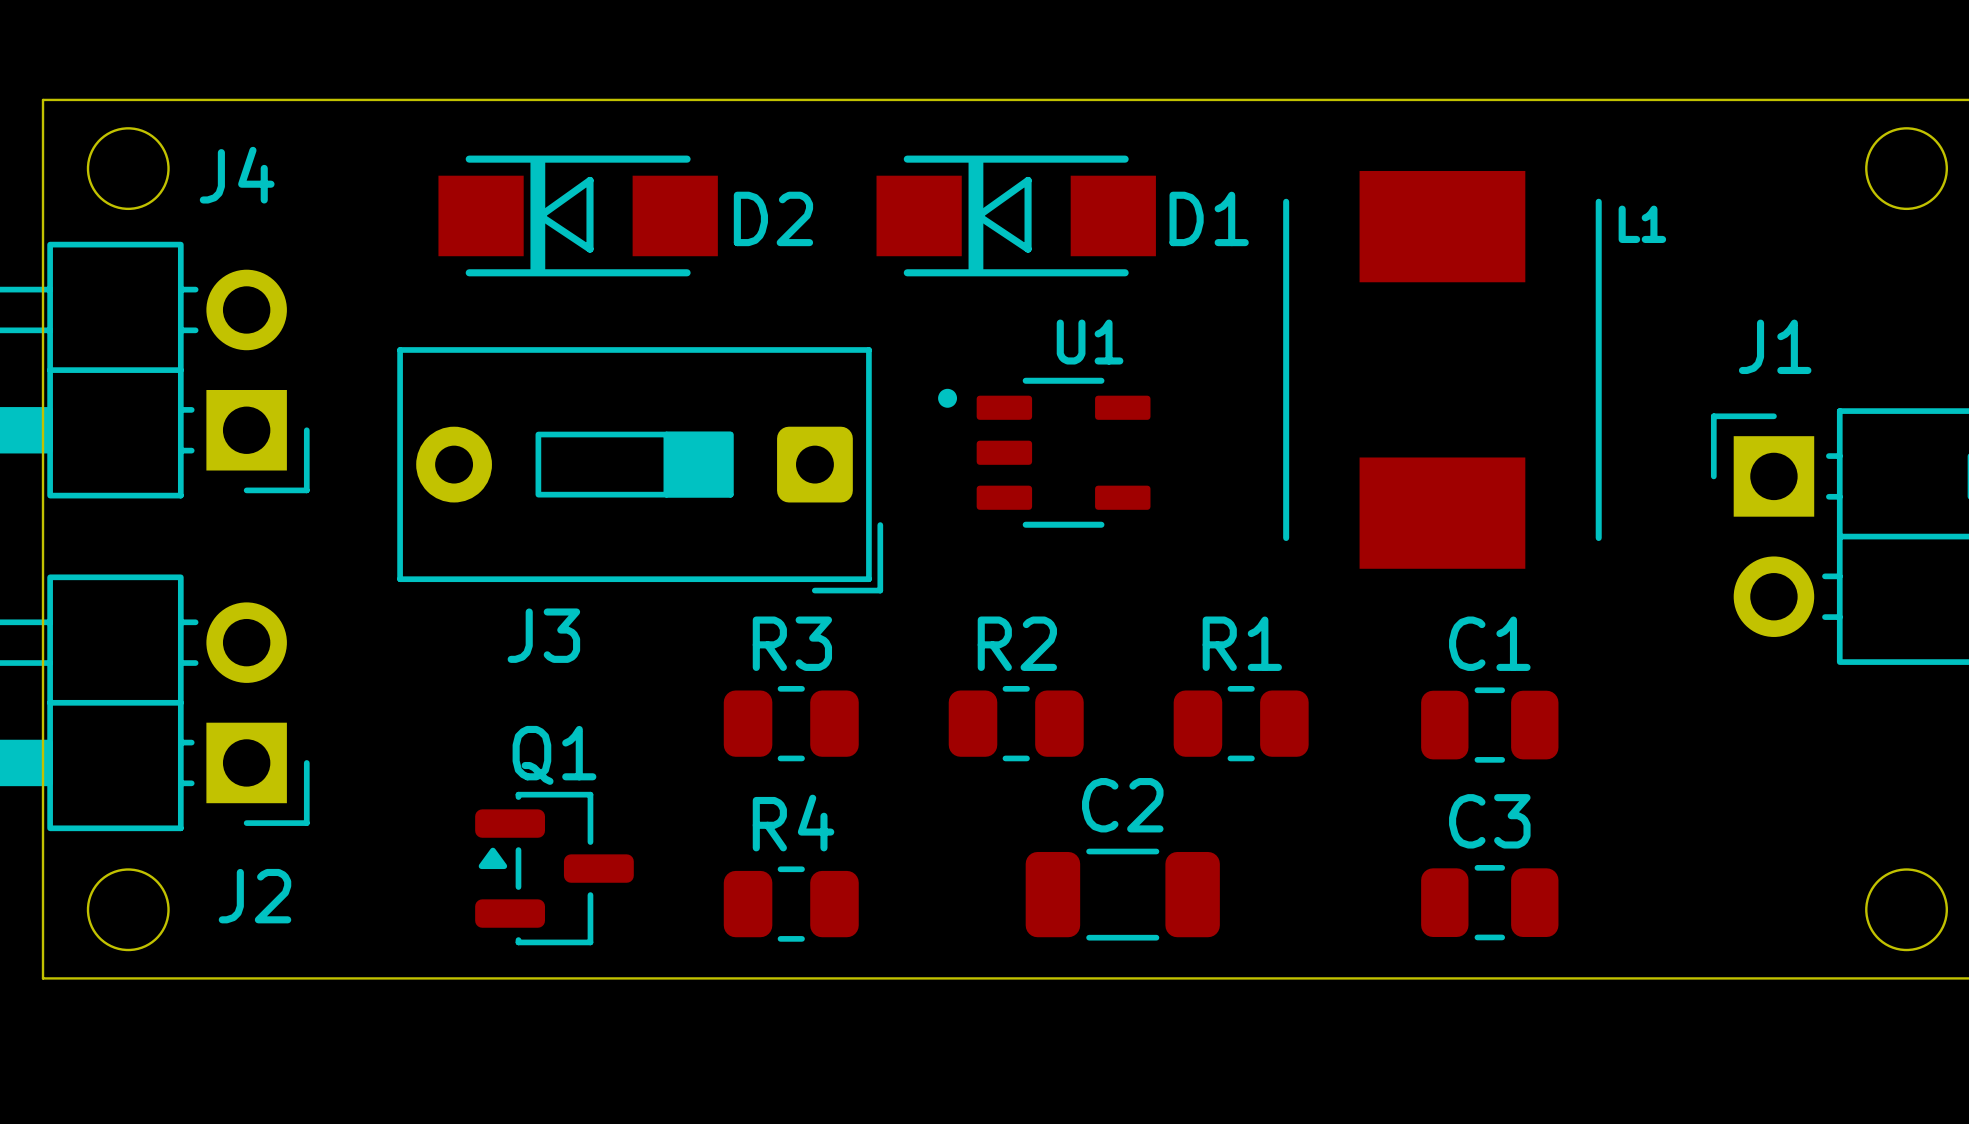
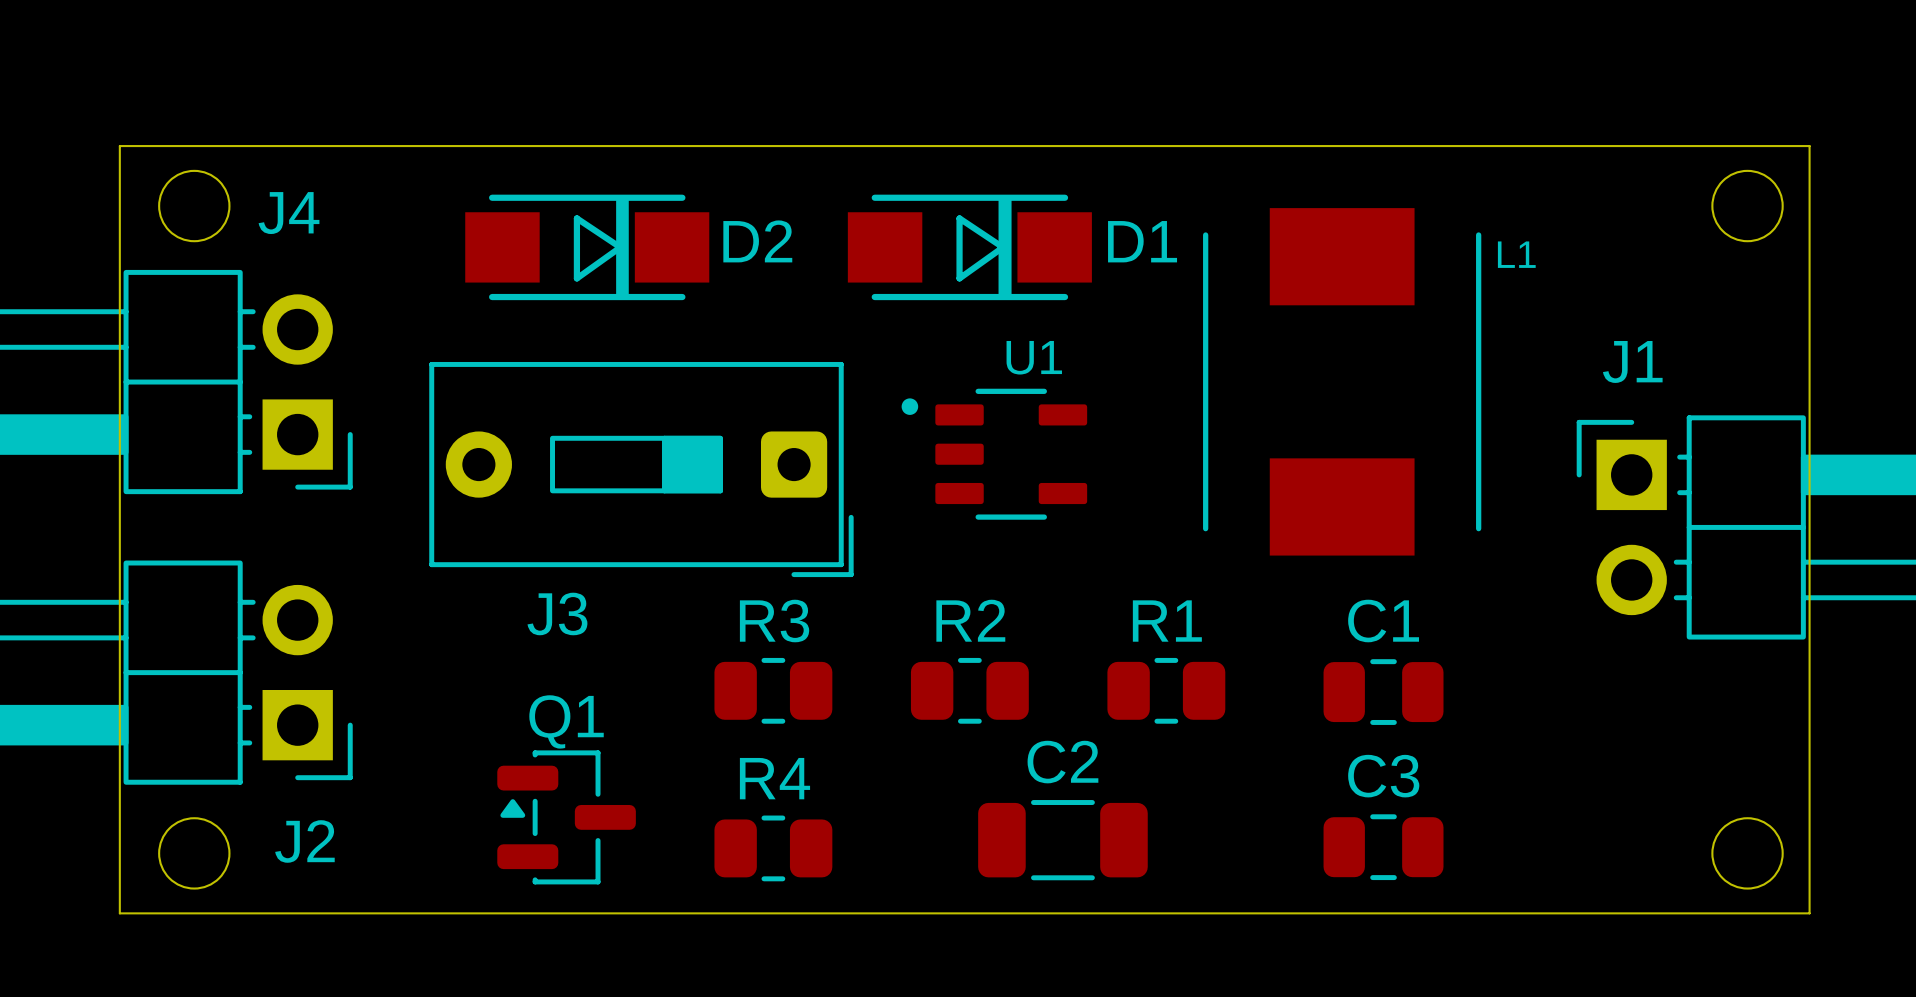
D2 rotation: 0° (578, 215) -> 180° (587, 247)
D1 rotation: 0° (1016, 215) -> 180° (969, 247)

